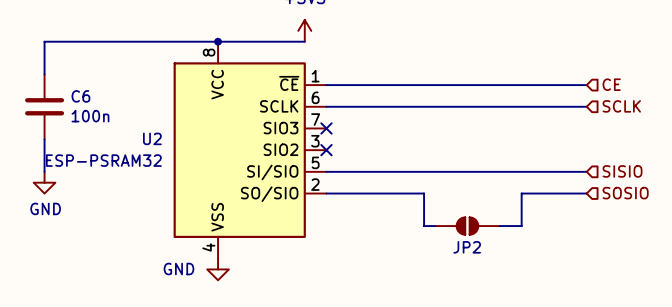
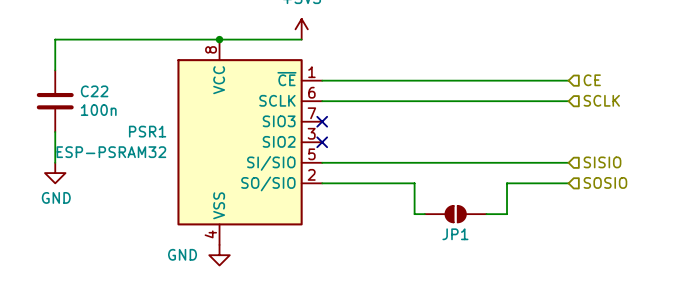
C6 name: C6 (80, 96) -> C22 (94, 91)
U2 name: U2 (152, 138) -> PSR1 (147, 131)
JP2 name: JP2 (467, 247) -> JP1 (455, 234)

